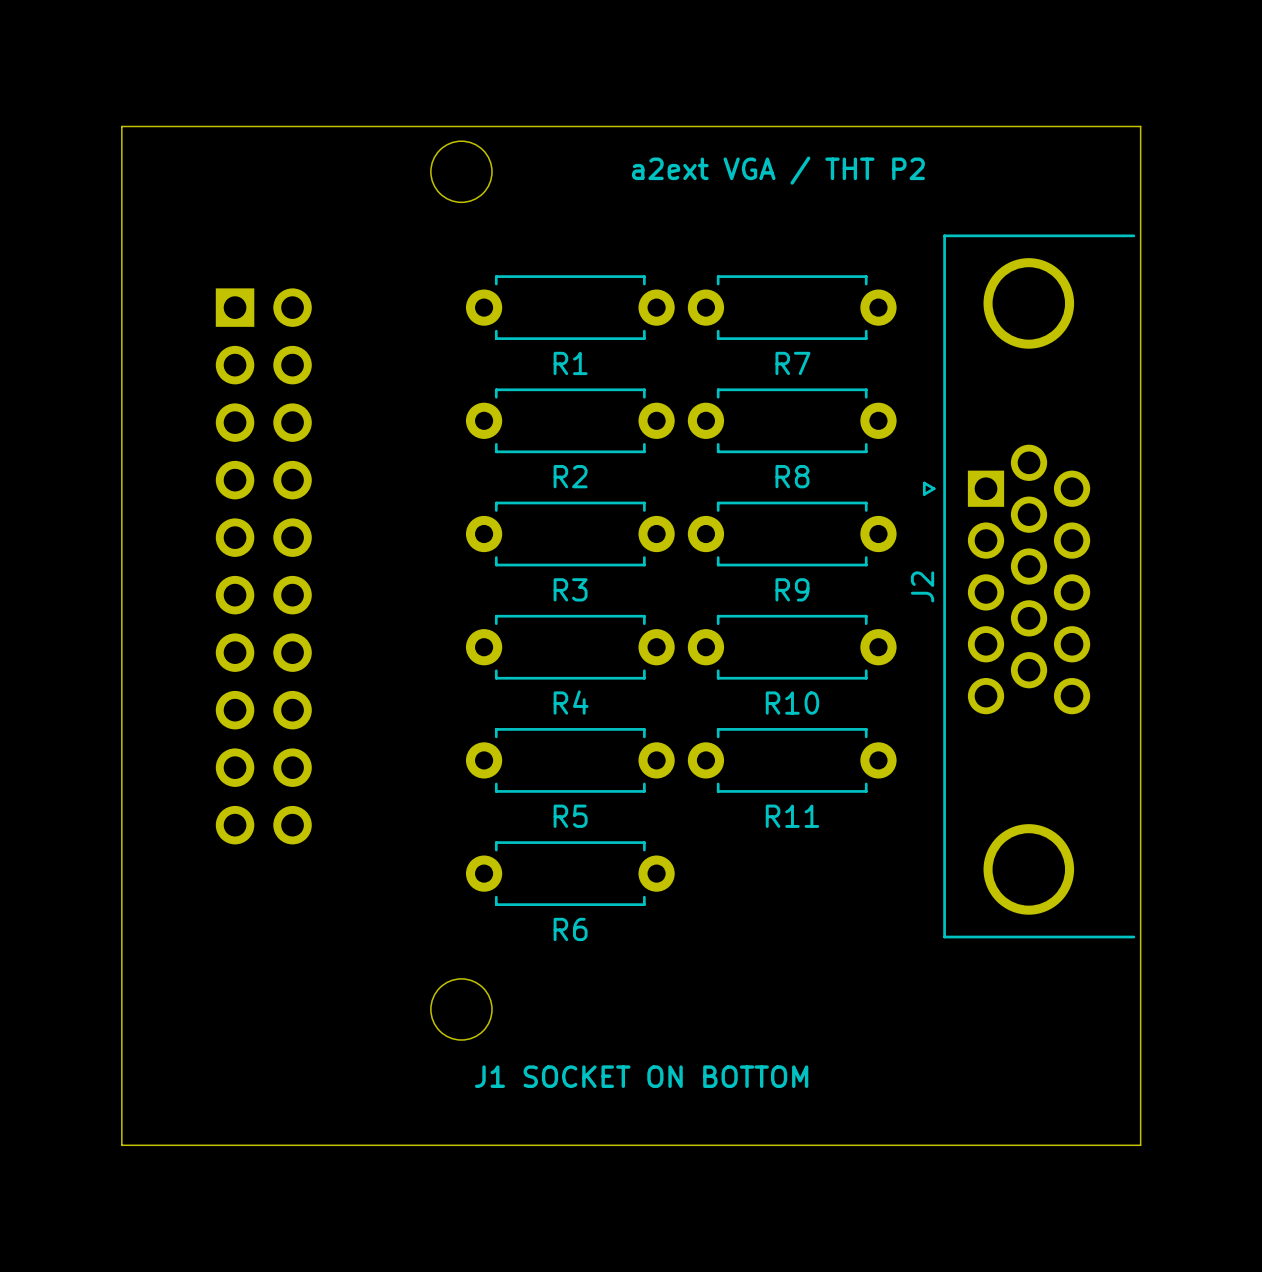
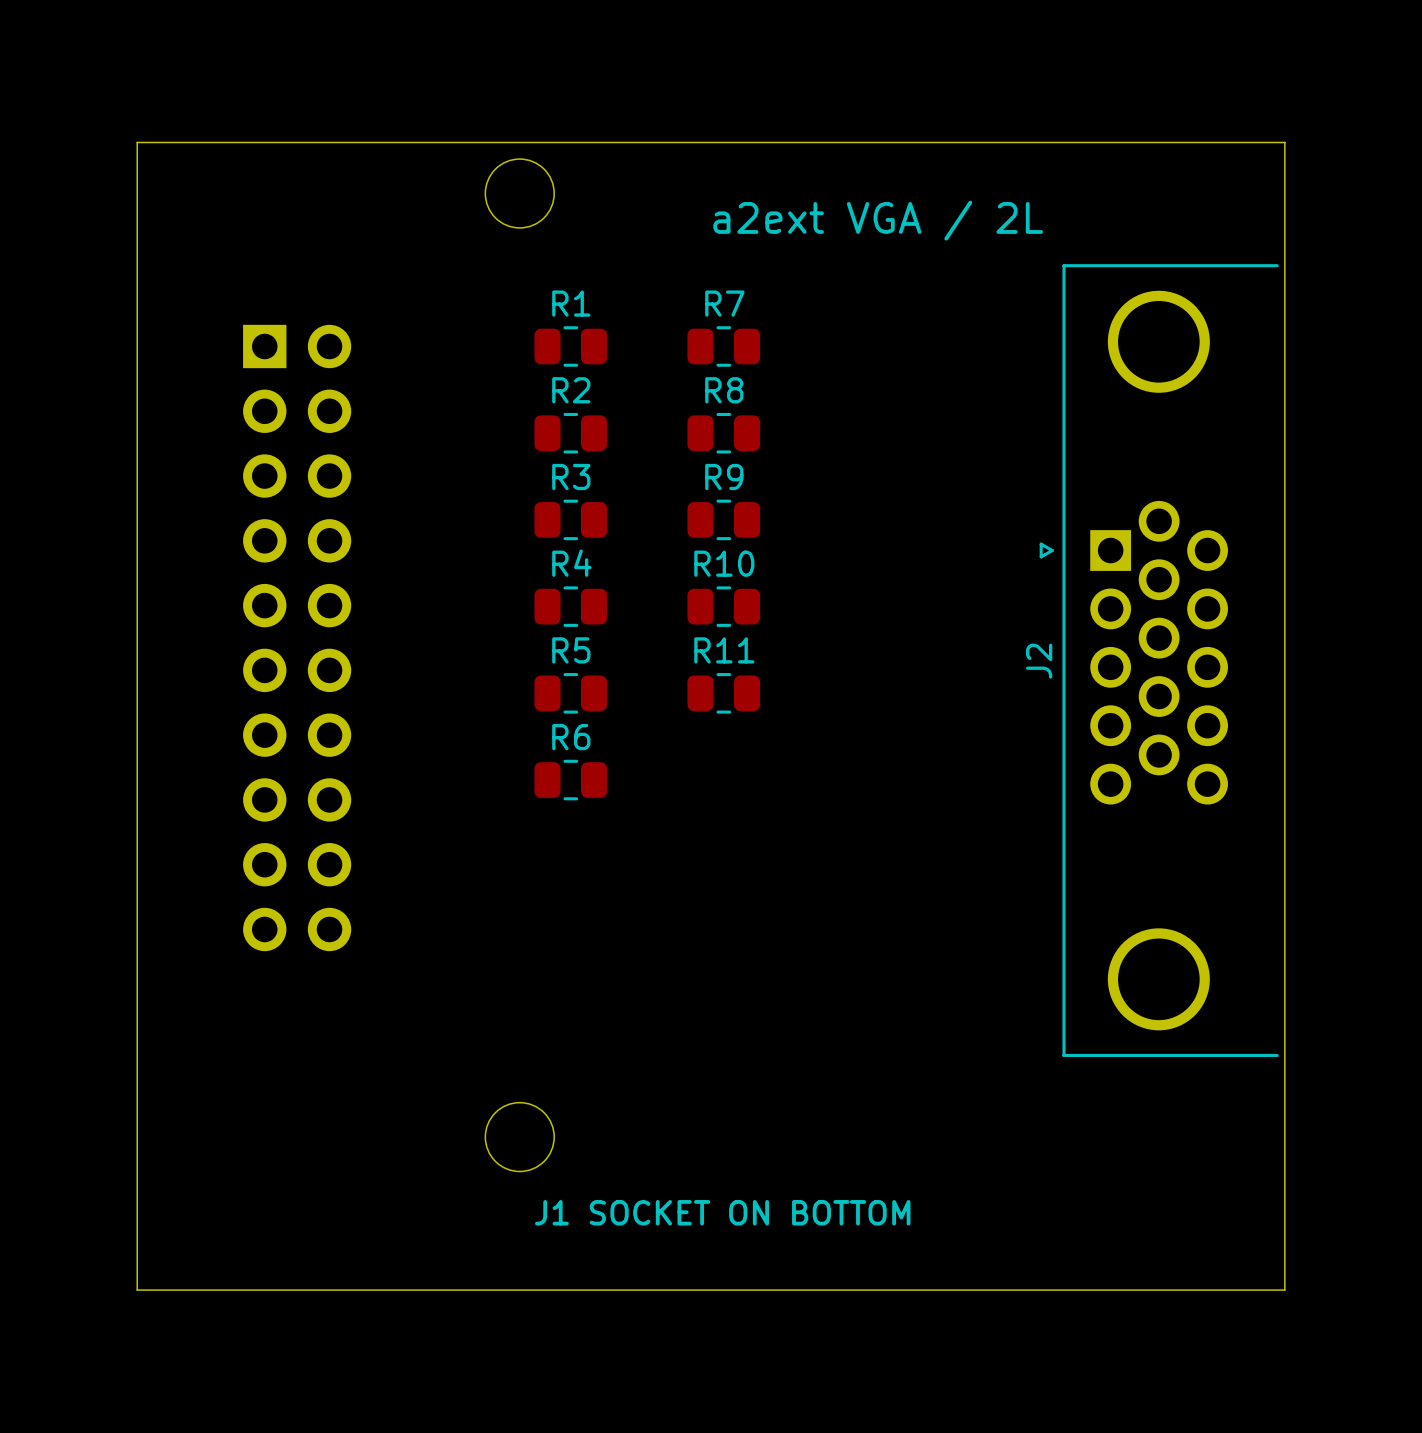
text: a2ext VGA / THT P2 (778, 170) -> a2ext VGA / 2L (878, 220)
R1 footprint: [465, 275, 675, 340] -> [534, 326, 608, 367]
R7 footprint: [687, 275, 897, 340] -> [687, 326, 761, 367]
R1 name position: R1 (570, 363) -> R1 (571, 303)
R7 name position: R7 (792, 363) -> R7 (724, 303)
R2 footprint: [465, 388, 675, 454] -> [534, 412, 608, 454]
R8 footprint: [687, 388, 897, 454] -> [687, 412, 761, 454]
R2 name position: R2 (570, 476) -> R2 (571, 390)
R8 name position: R8 (792, 476) -> R8 (724, 390)
R3 footprint: [465, 501, 675, 567] -> [534, 499, 608, 541]
R9 footprint: [687, 501, 897, 567] -> [687, 499, 761, 541]
R3 name position: R3 (570, 589) -> R3 (571, 476)
R9 name position: R9 (792, 589) -> R9 (724, 476)
R4 footprint: [465, 614, 675, 680] -> [534, 586, 608, 627]
R10 footprint: [687, 614, 897, 680] -> [687, 586, 761, 627]
R4 name position: R4 (571, 702) -> R4 (571, 563)
R10 name position: R10 (792, 703) -> R10 (724, 563)
R5 footprint: [465, 728, 675, 793] -> [534, 673, 608, 714]
R11 footprint: [687, 728, 897, 793] -> [687, 673, 761, 714]
R5 name position: R5 (570, 816) -> R5 (571, 650)
R11 name position: R11 (792, 816) -> R11 (724, 650)
R6 footprint: [465, 841, 675, 906] -> [534, 759, 608, 801]
R6 name position: R6 (570, 929) -> R6 (571, 737)

